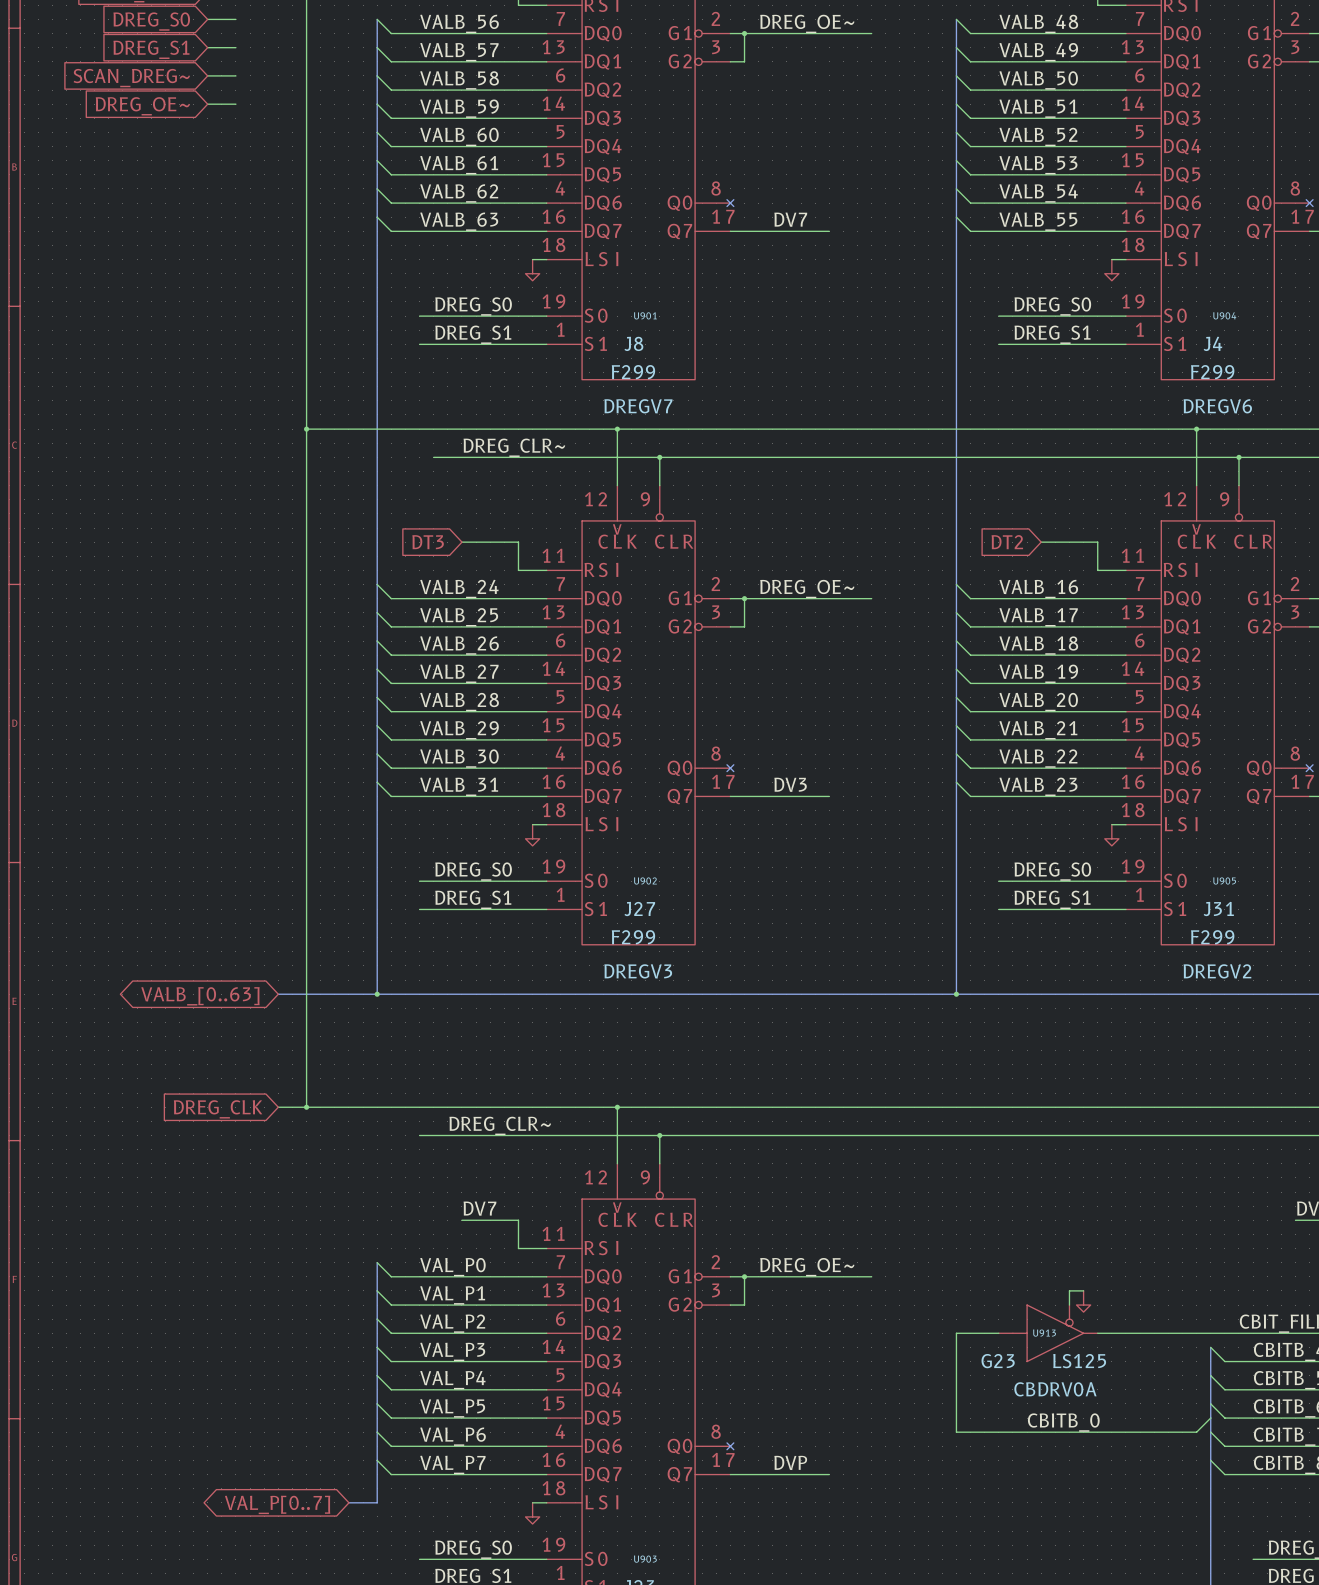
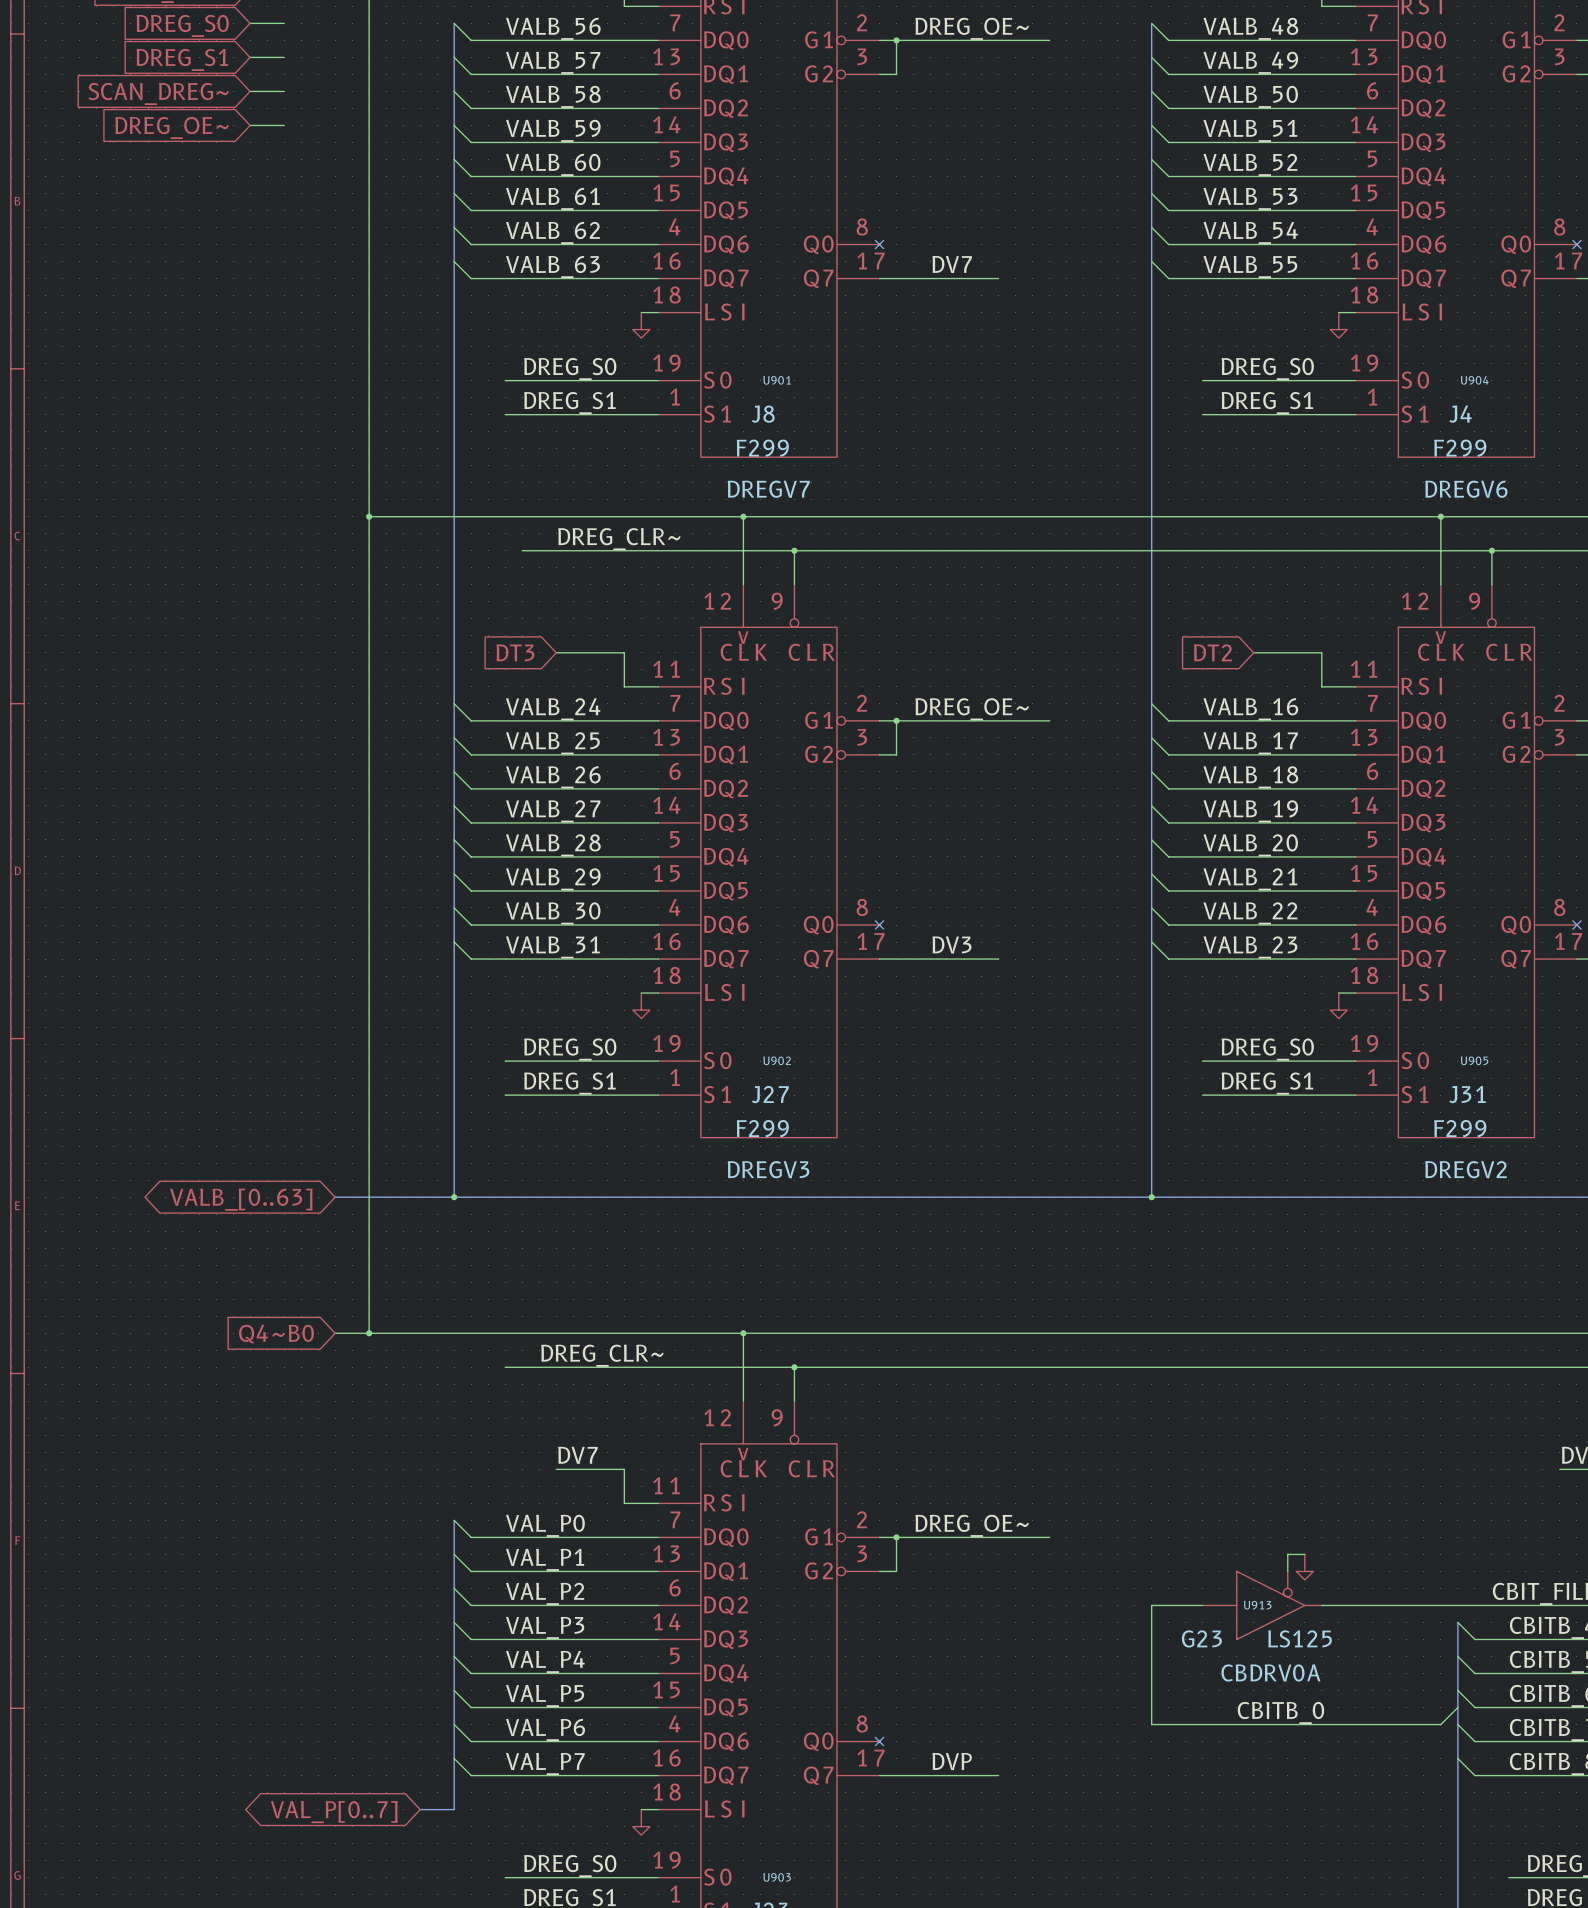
global label: DREG_CLK (218, 1109) -> Q4~B0 (276, 1334)

